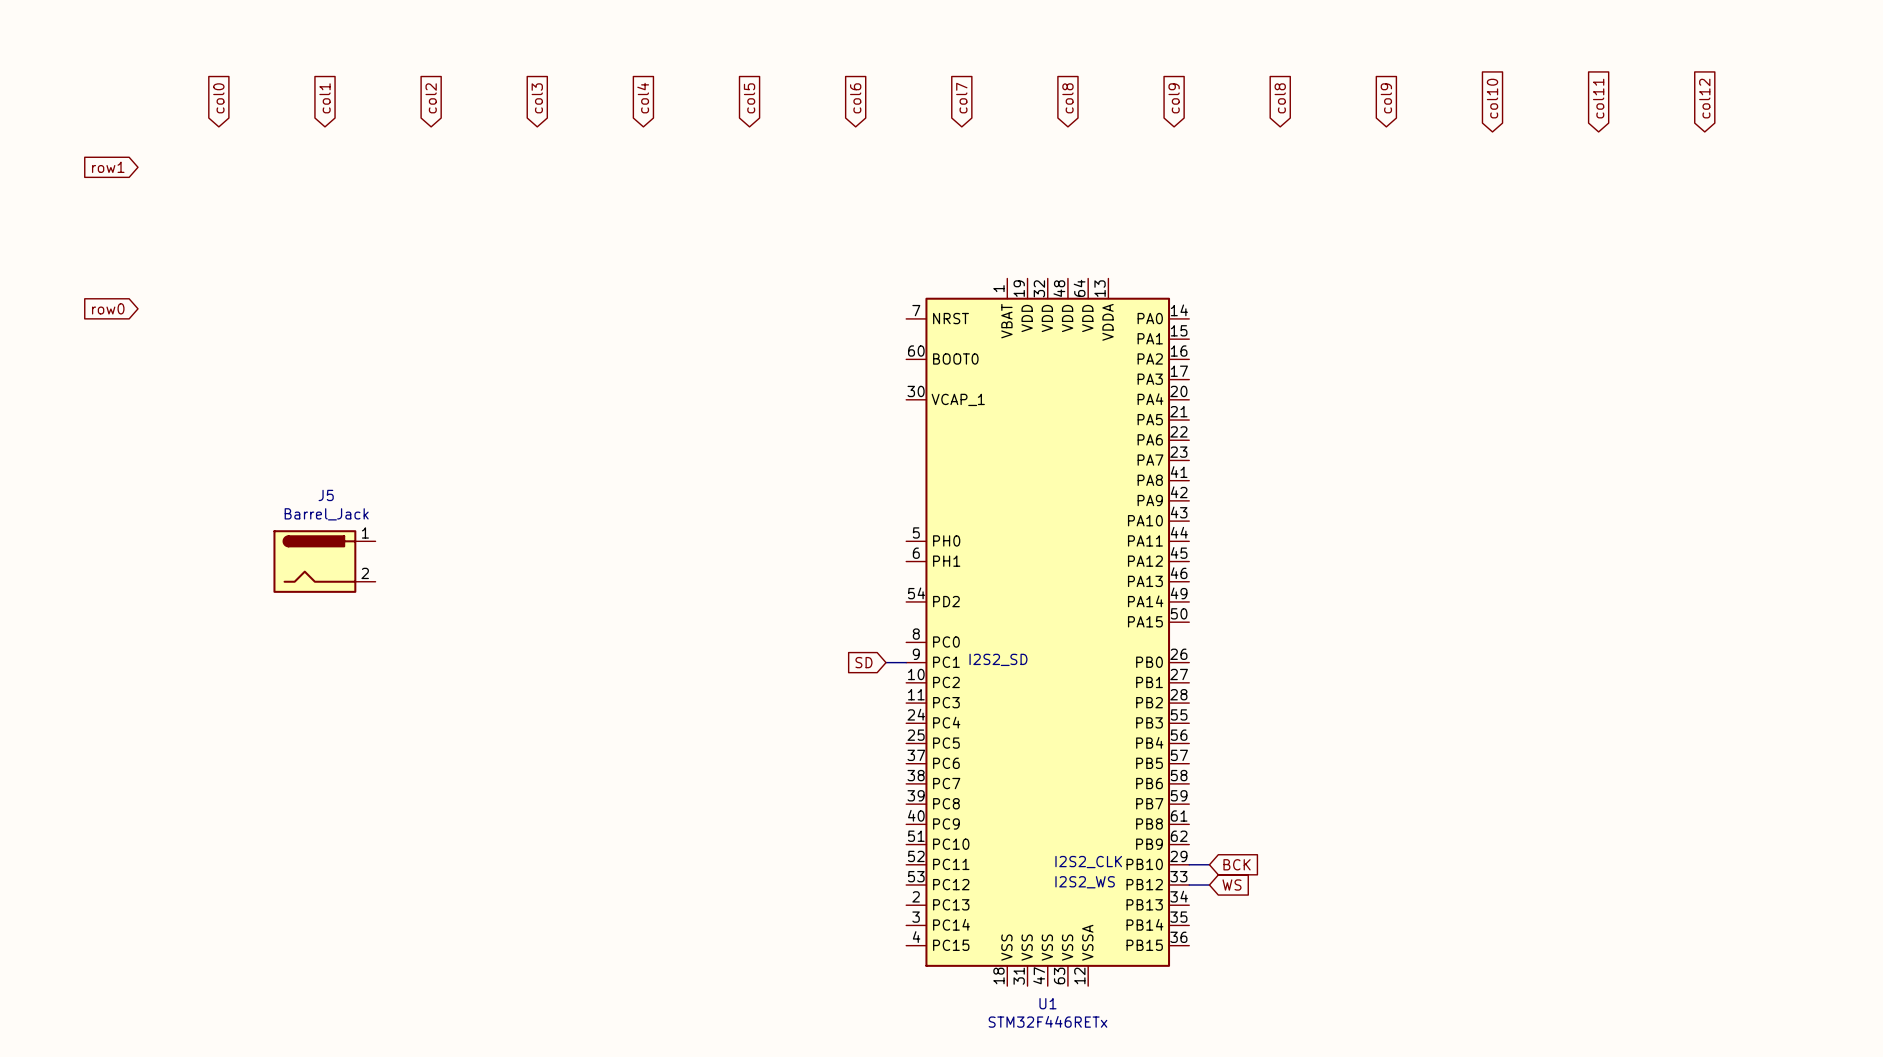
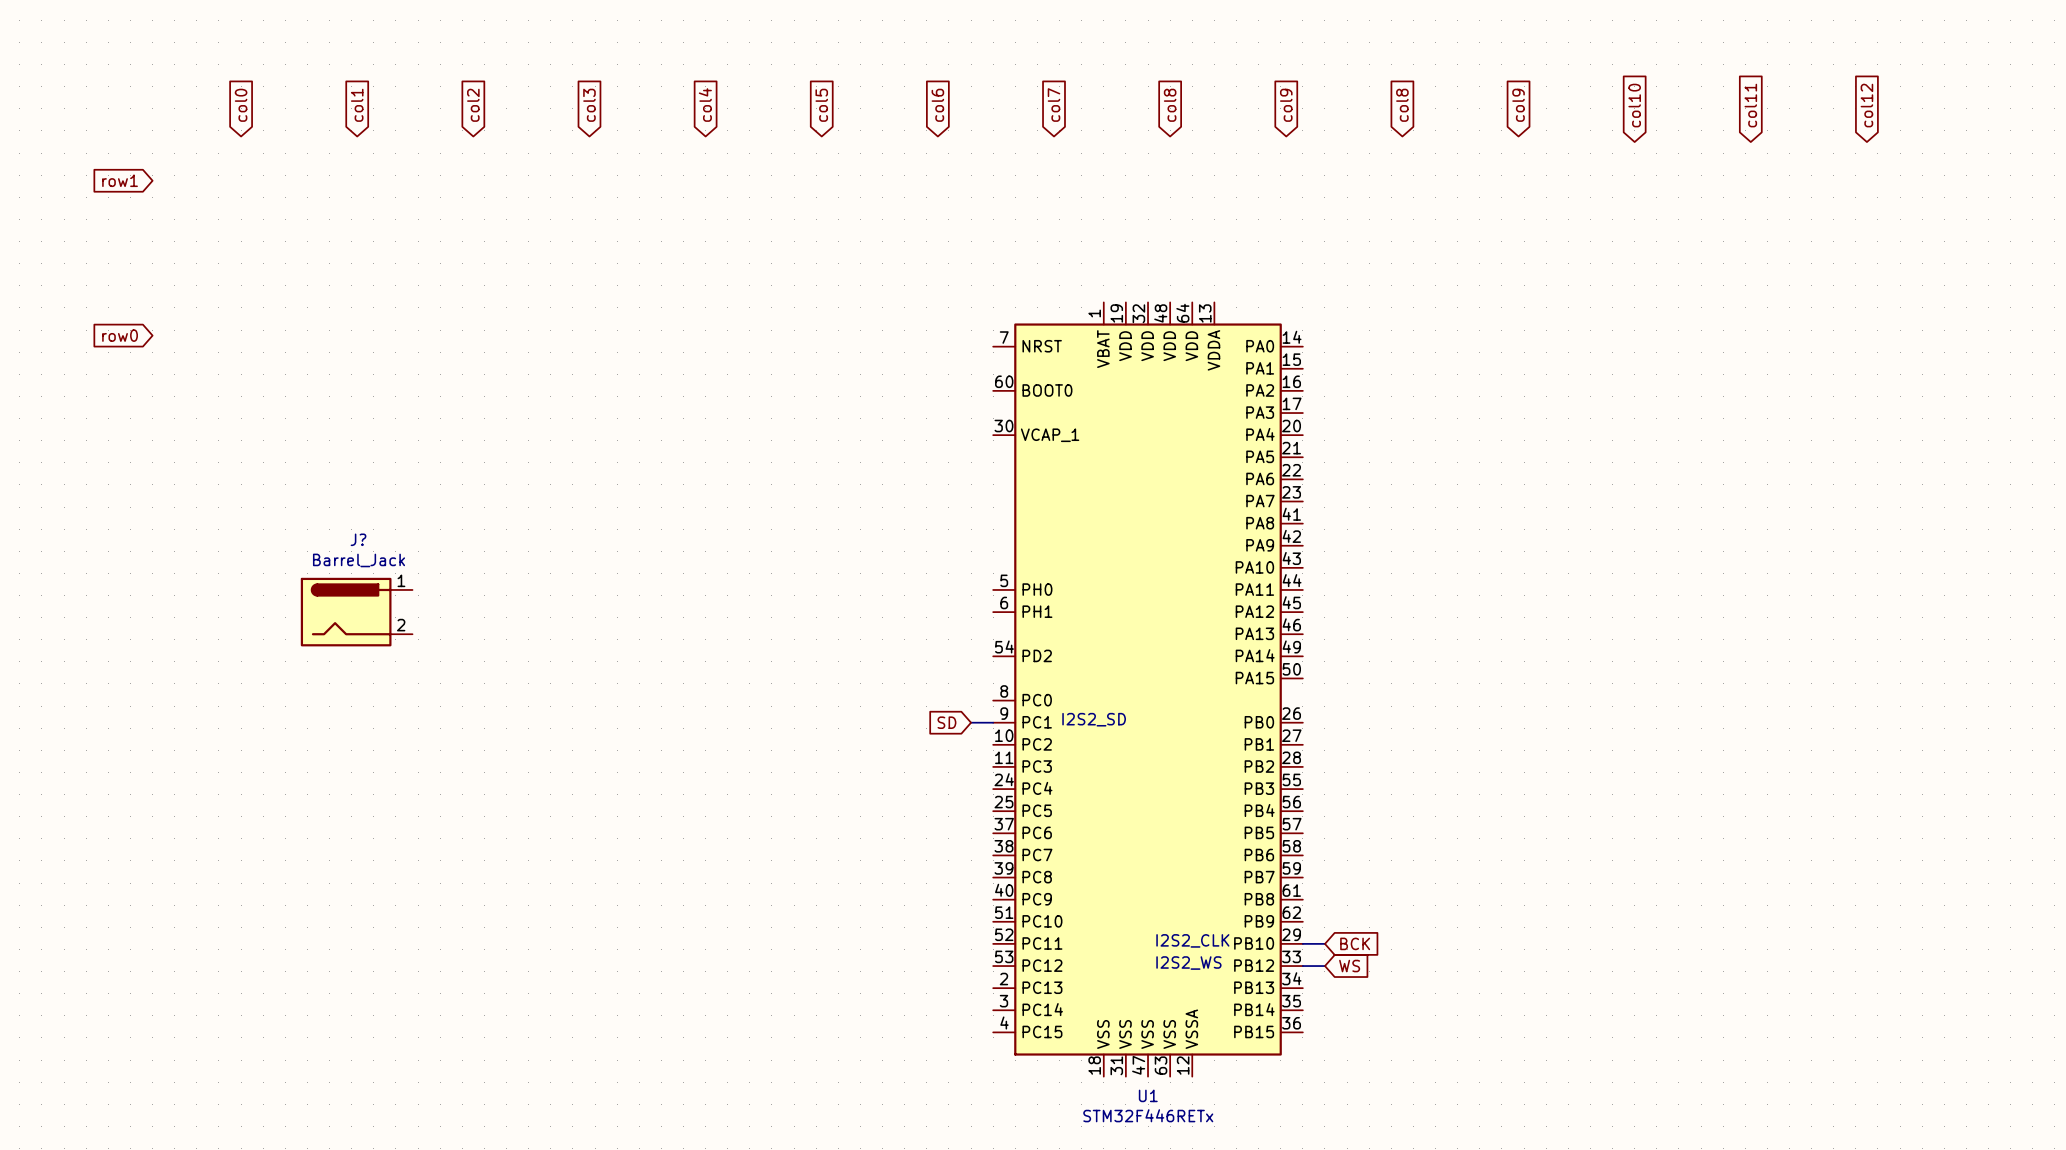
J5 name: J5 (326, 495) -> J? (358, 539)

